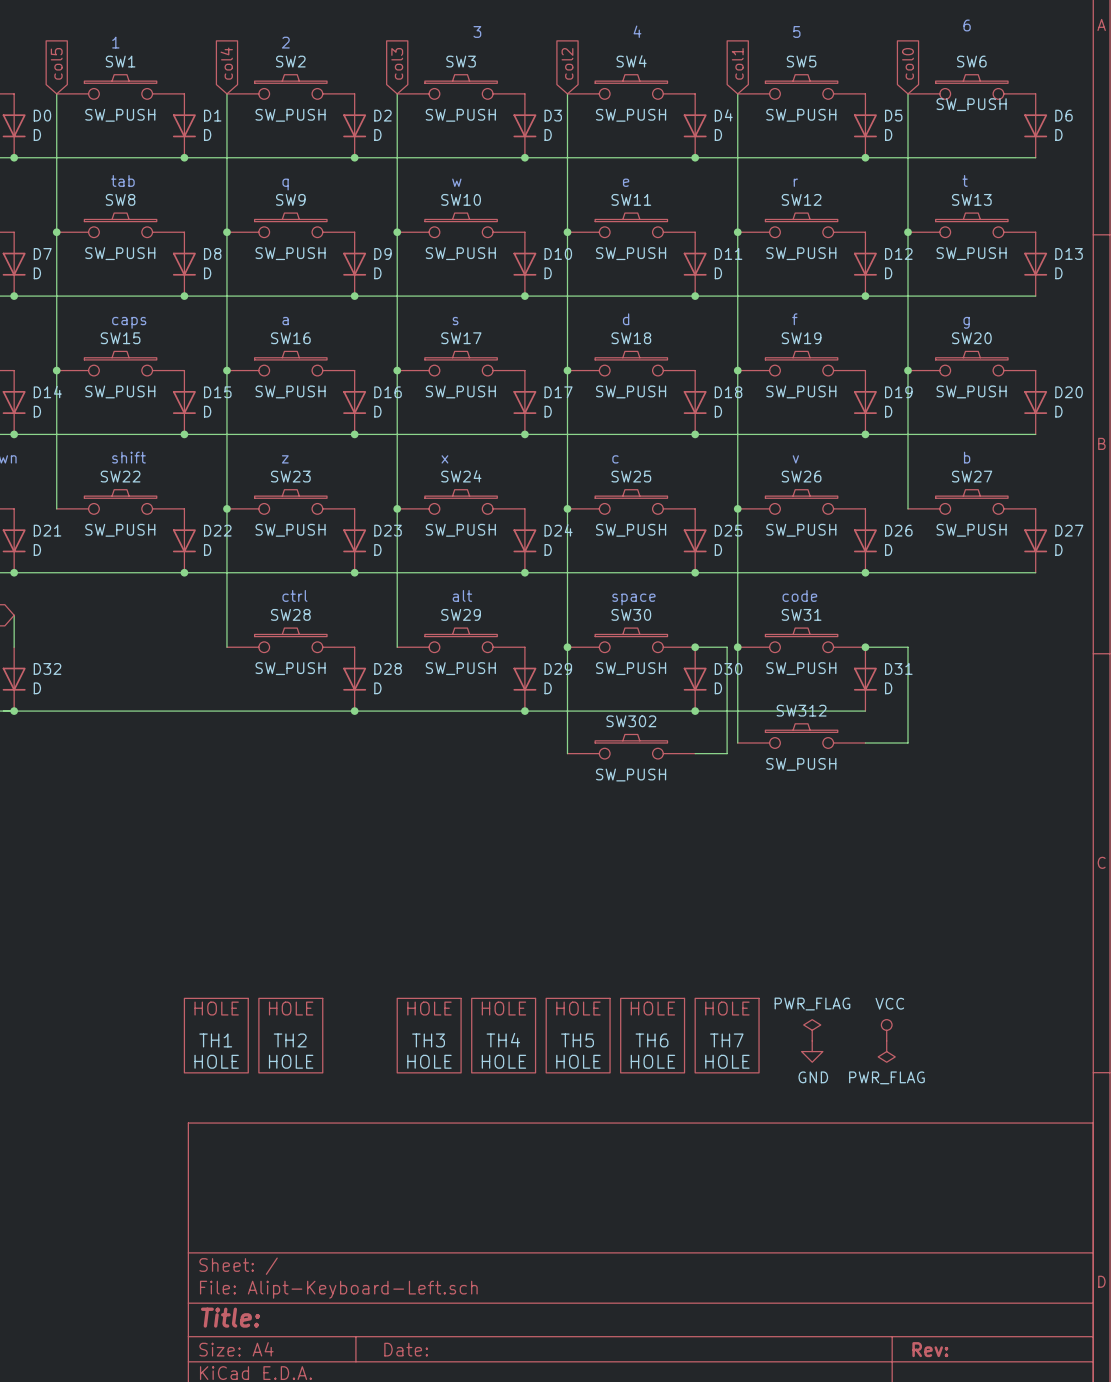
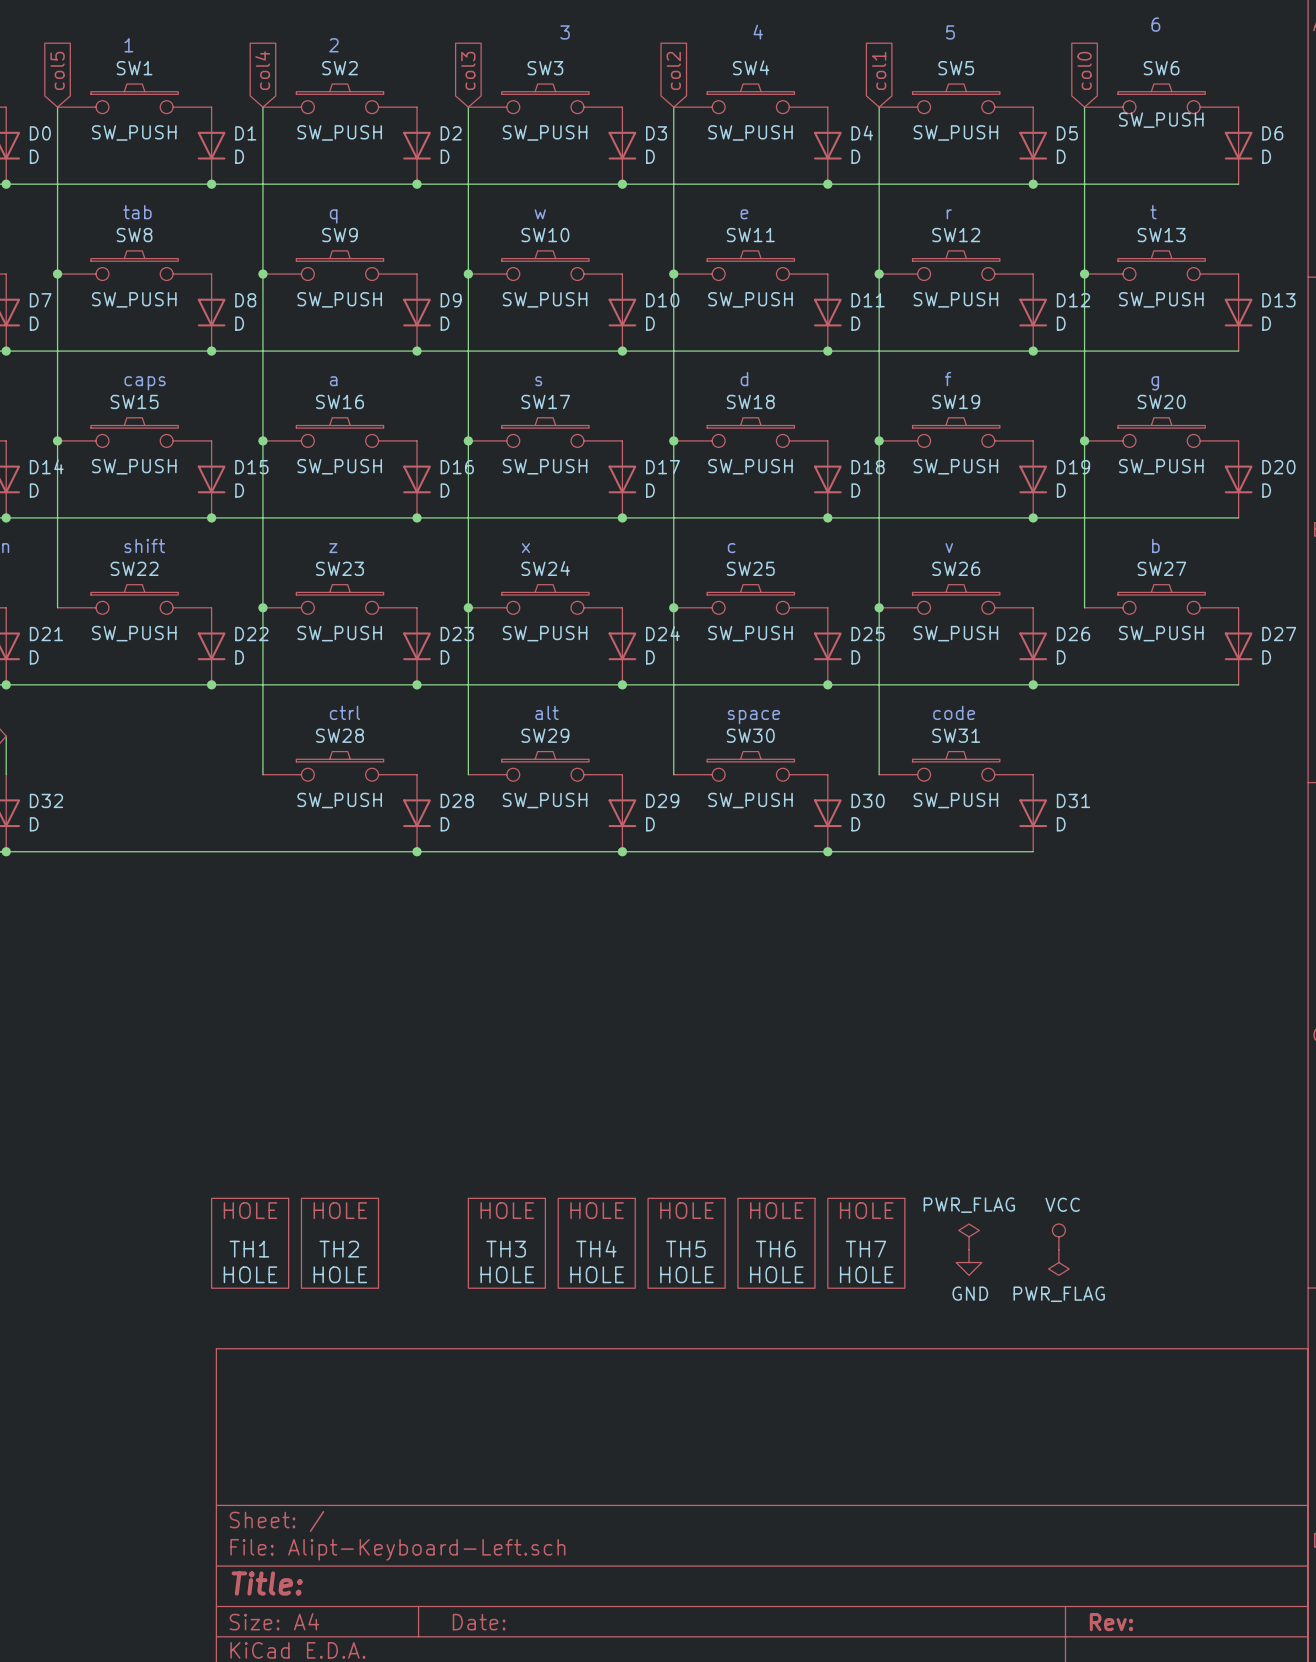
wire: (567, 647) (567, 753) -> none
junction: (567, 647) -> none
wire: (695, 647) (727, 647) (727, 753) (695, 753) -> none
junction: (695, 647) -> none
wire: (737, 647) (737, 742) -> none
junction: (737, 647) -> none
wire: (865, 647) (907, 647) (907, 742) (865, 742) -> none
junction: (865, 647) -> none
SW312: SW_PUSH (801, 736) -> none
SW302: SW_PUSH (631, 746) -> none

